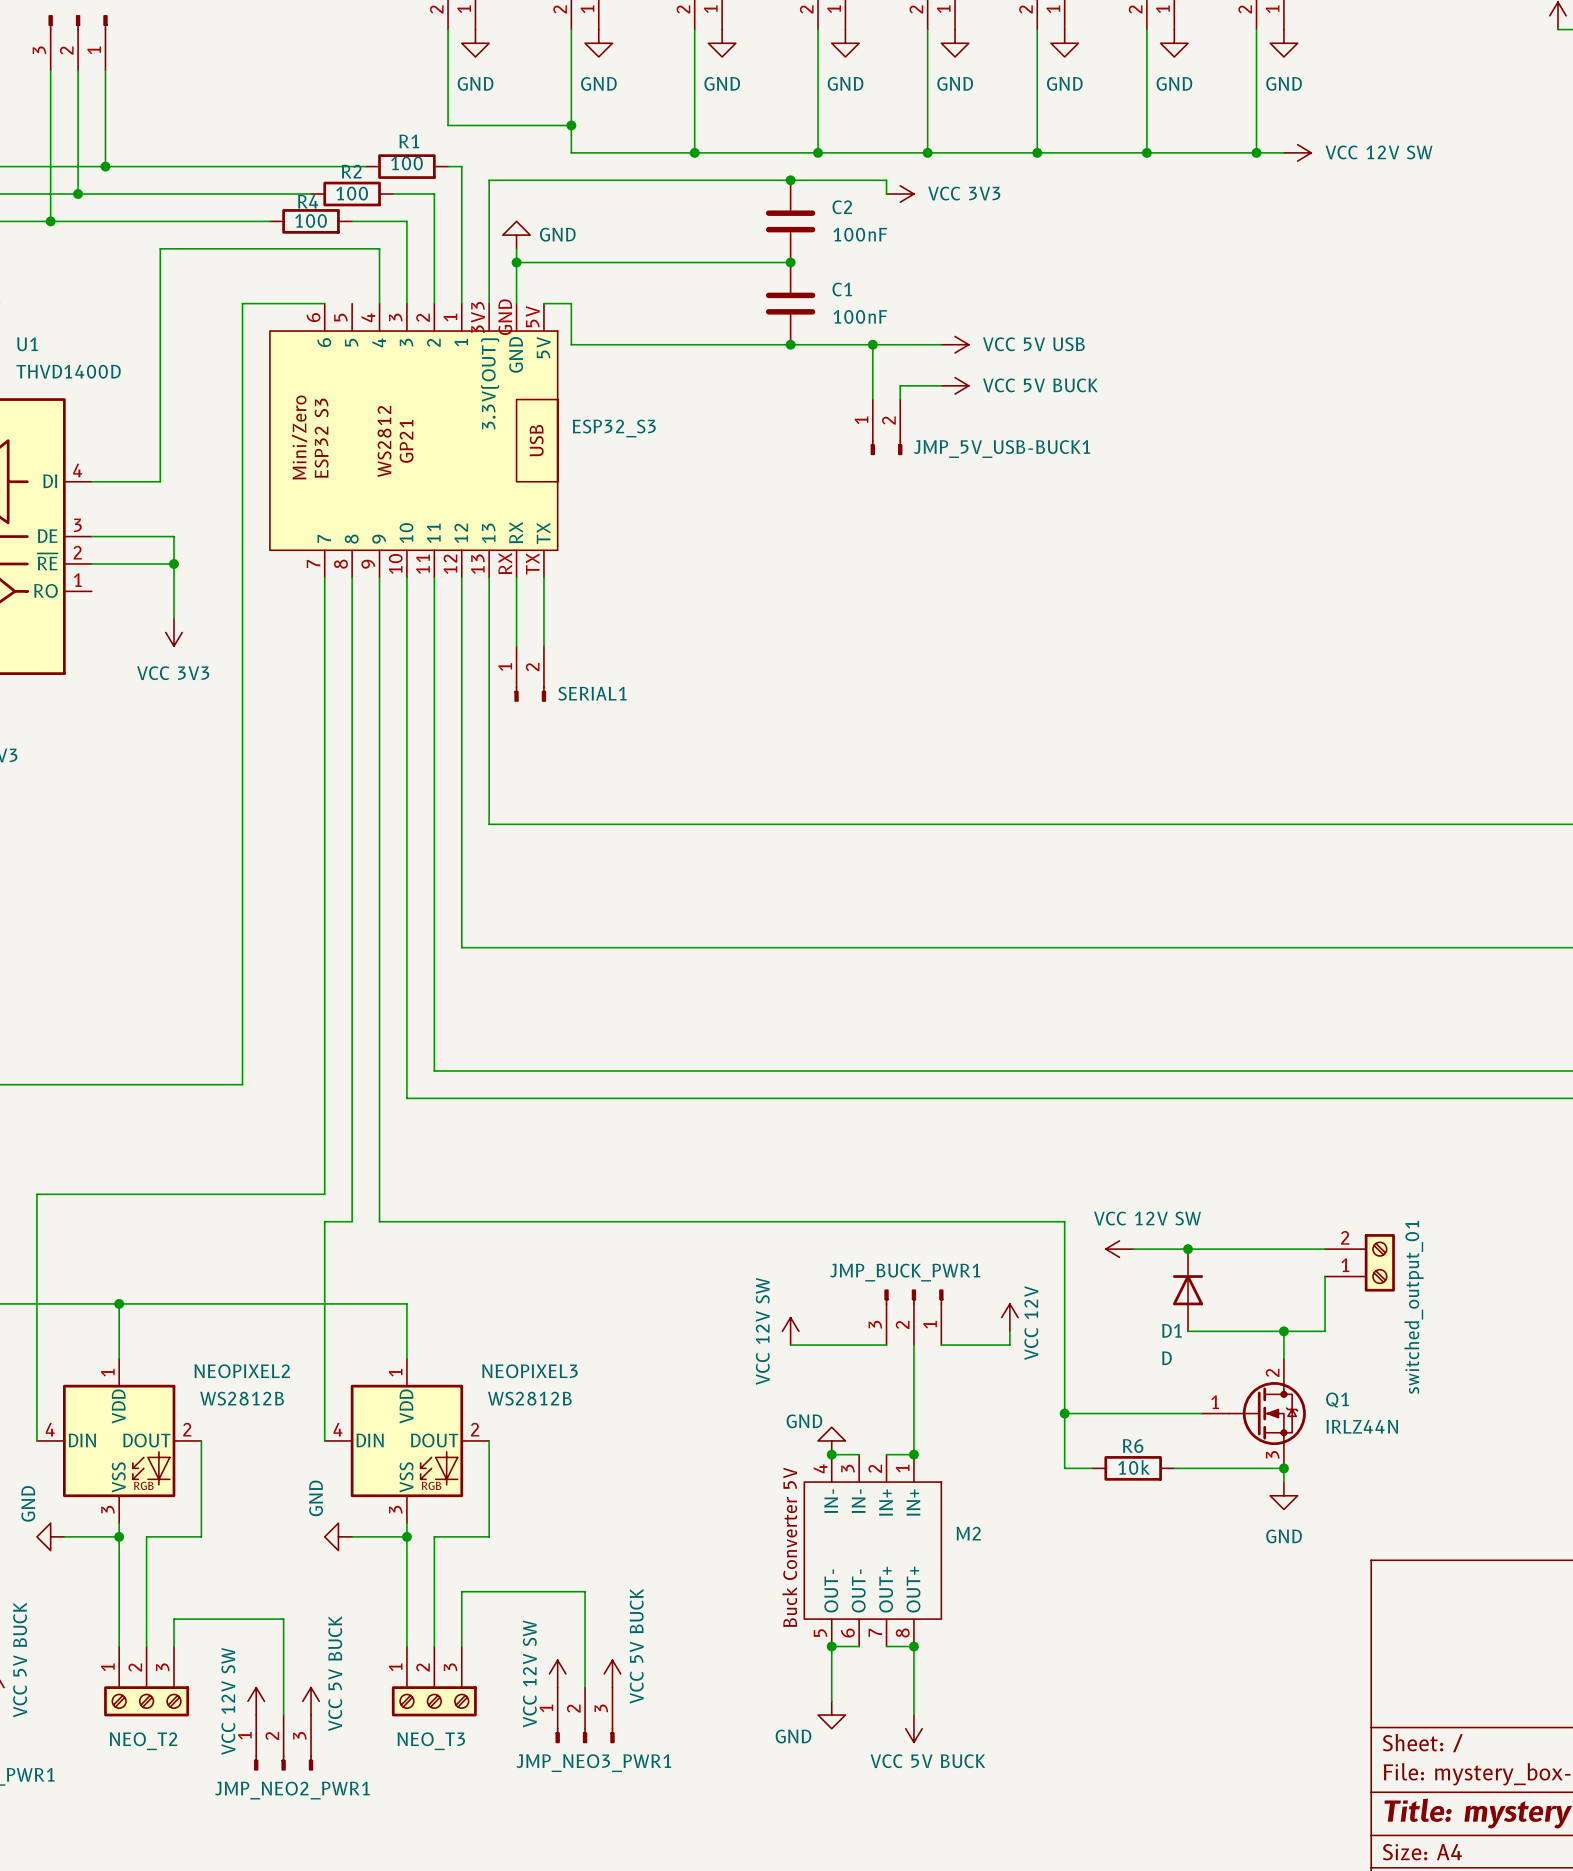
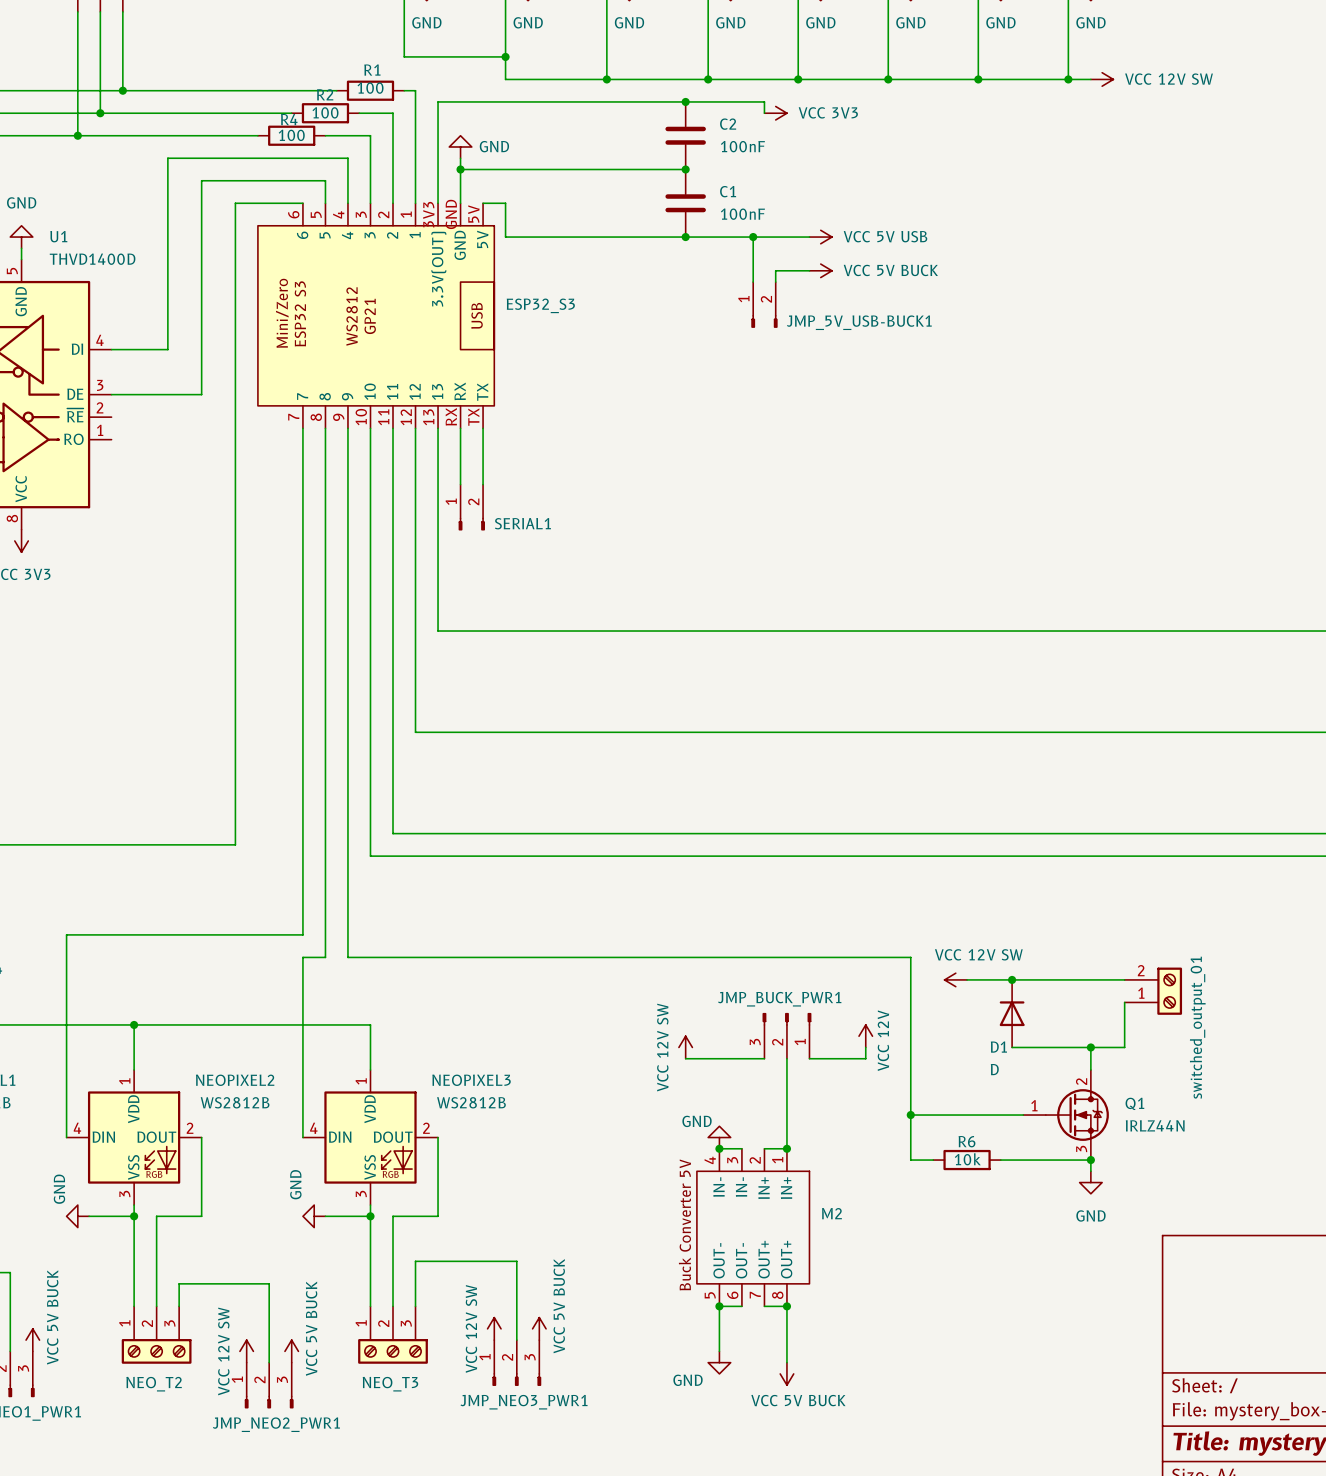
wire: (173, 536) (173, 618) -> (179, 394) (201, 394) (201, 180) (325, 180) (325, 203)
wire: (91, 563) (173, 563) -> none
junction: (173, 563) -> none
power symbol: VCC 3V3 (173, 632) -> none

